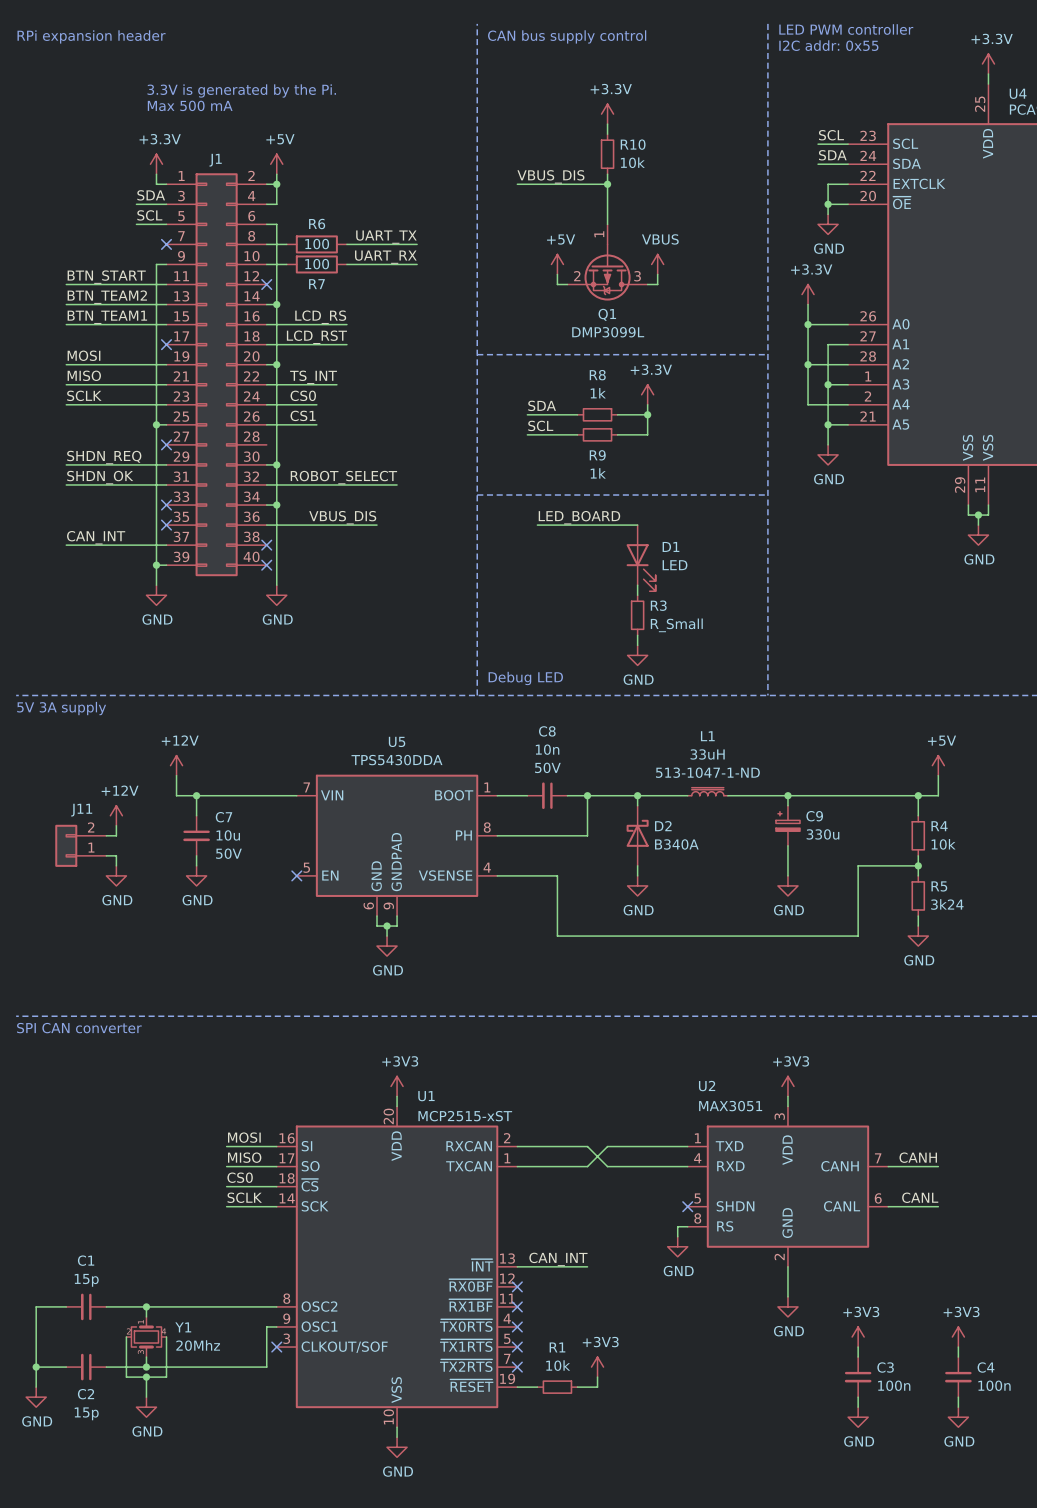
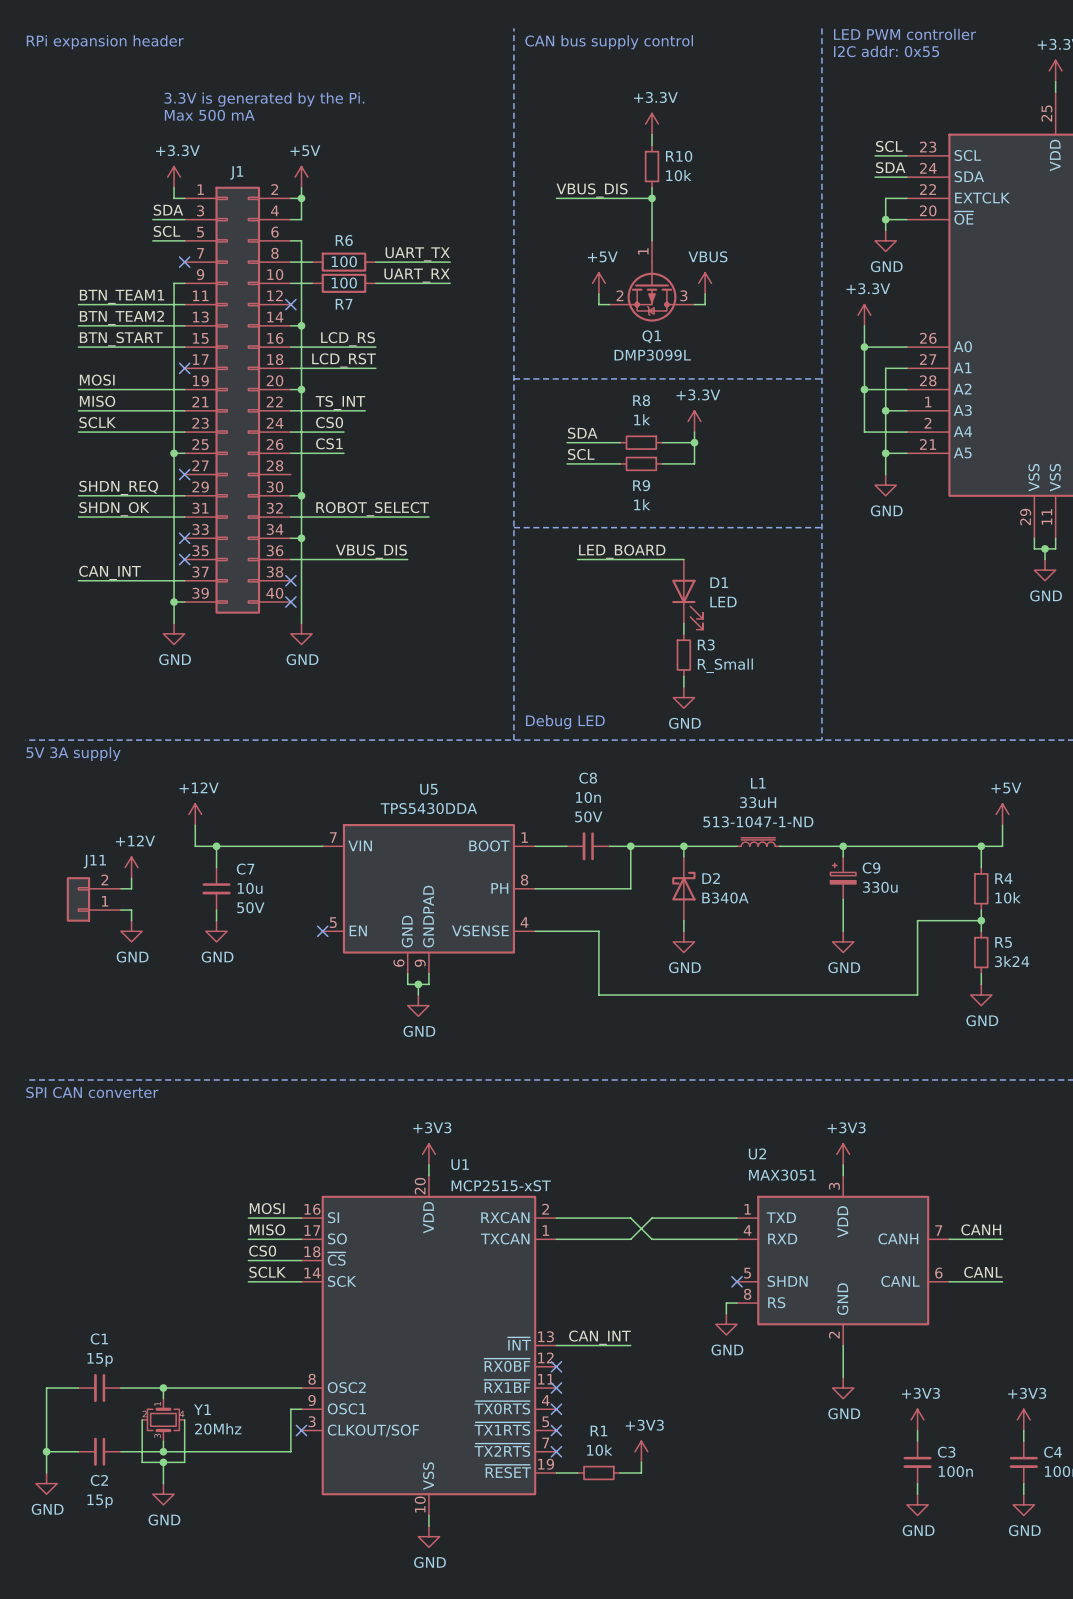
label: BTN_START (106, 277) -> BTN_TEAM1 (121, 296)
label: BTN_TEAM1 (107, 317) -> BTN_START (121, 339)

